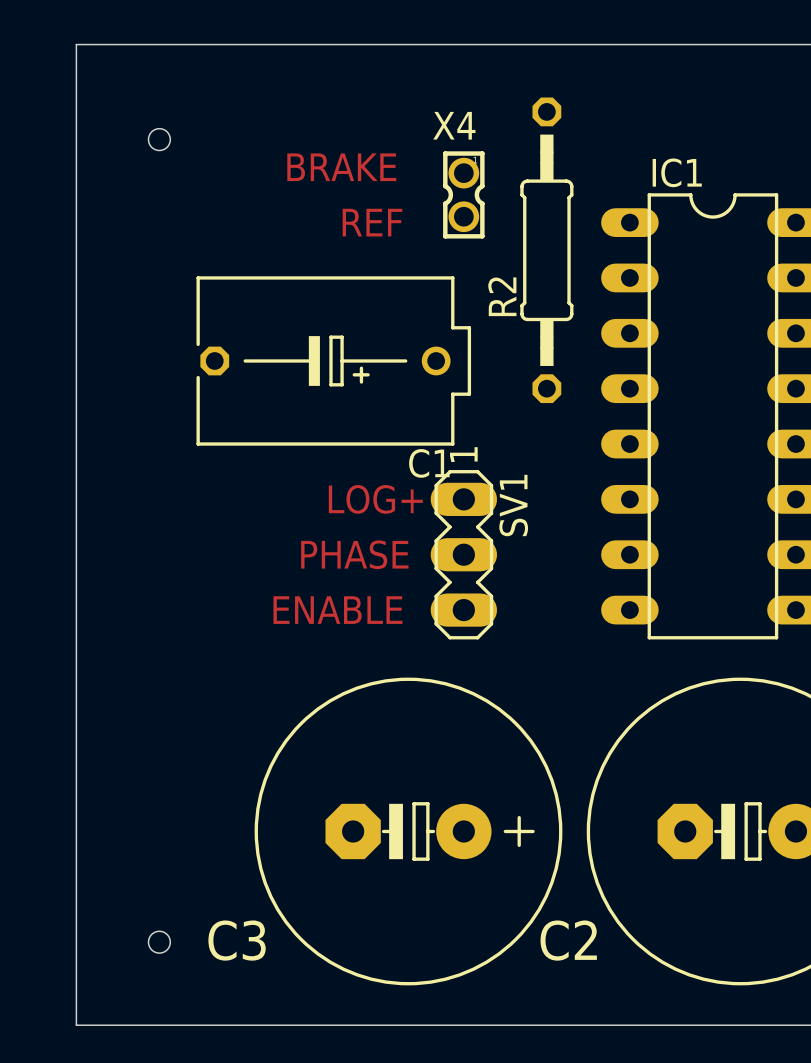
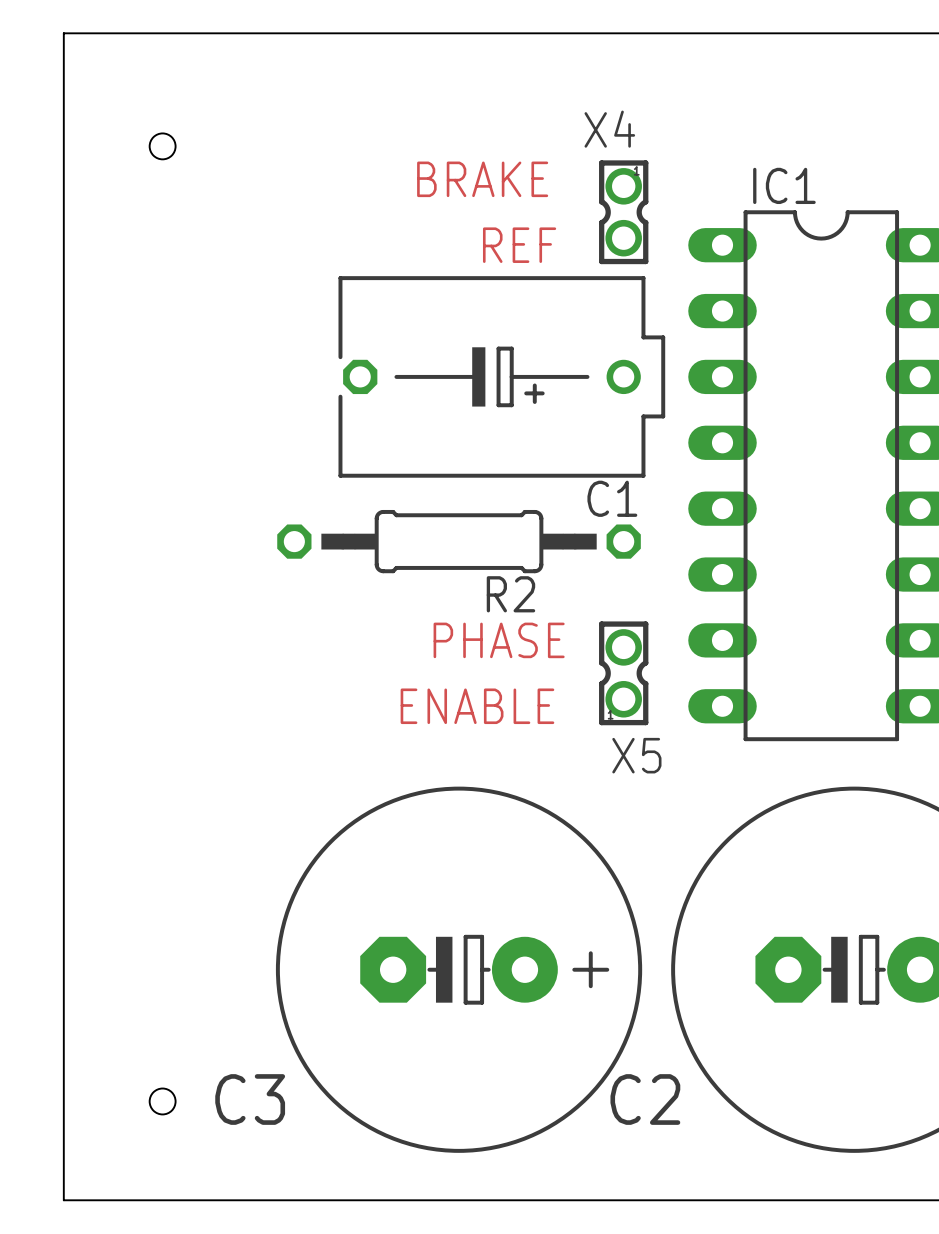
text position: BRAKE (341, 167) -> BRAKE (482, 179)
X4 position: (463, 194) -> (623, 212)
text position: REF (372, 222) -> REF (519, 245)
R2 rotation: 0° (546, 250) -> 90° clockwise (459, 541)
R2 position: (546, 250) -> (459, 541)
R2 name position: R2 (502, 296) -> R2 (510, 594)
C1 position: (333, 360) -> (501, 376)
text: LOG+ (375, 499) -> none
text position: PHASE (354, 554) -> PHASE (499, 640)
SV1: (463, 554) -> none
X5: none -> (623, 673)
text position: ENABLE (337, 610) -> ENABLE (477, 706)

